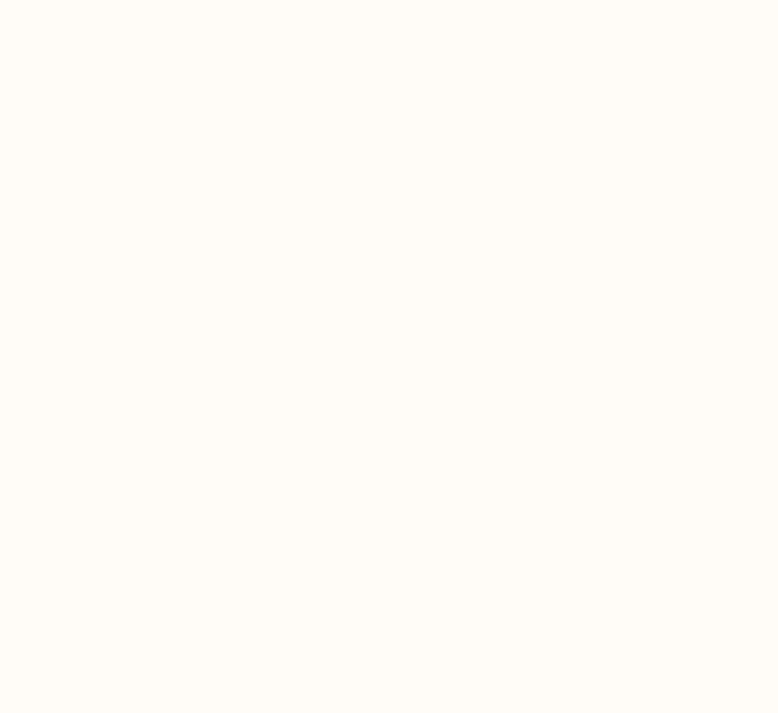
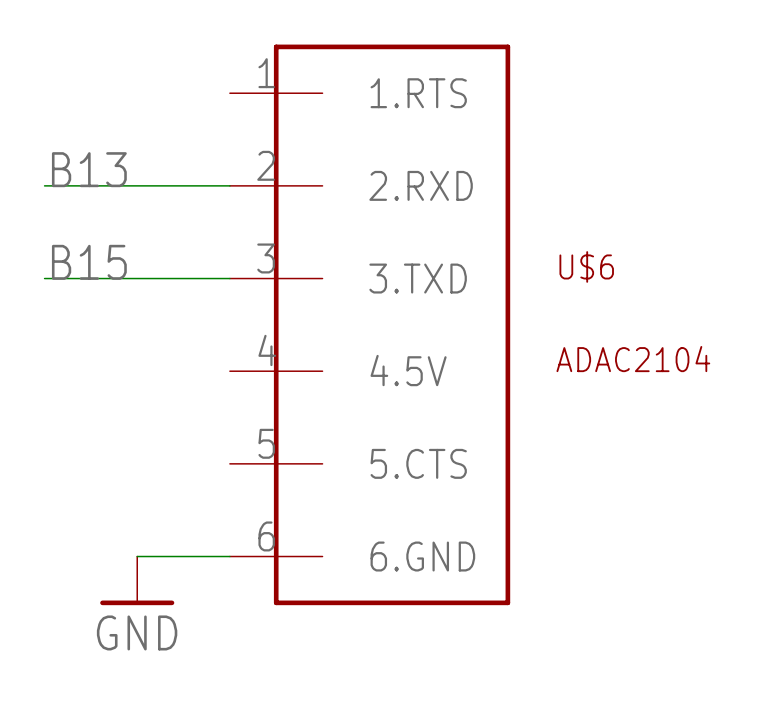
label: none -> B13 (89, 169)
wire: none -> (44, 185) (229, 185)
label: none -> B15 (89, 262)
wire: none -> (44, 278) (229, 278)
U$6: none -> ADAC2104 (370, 324)
wire: none -> (137, 556) (229, 556)
power symbol: none -> GND (137, 580)

